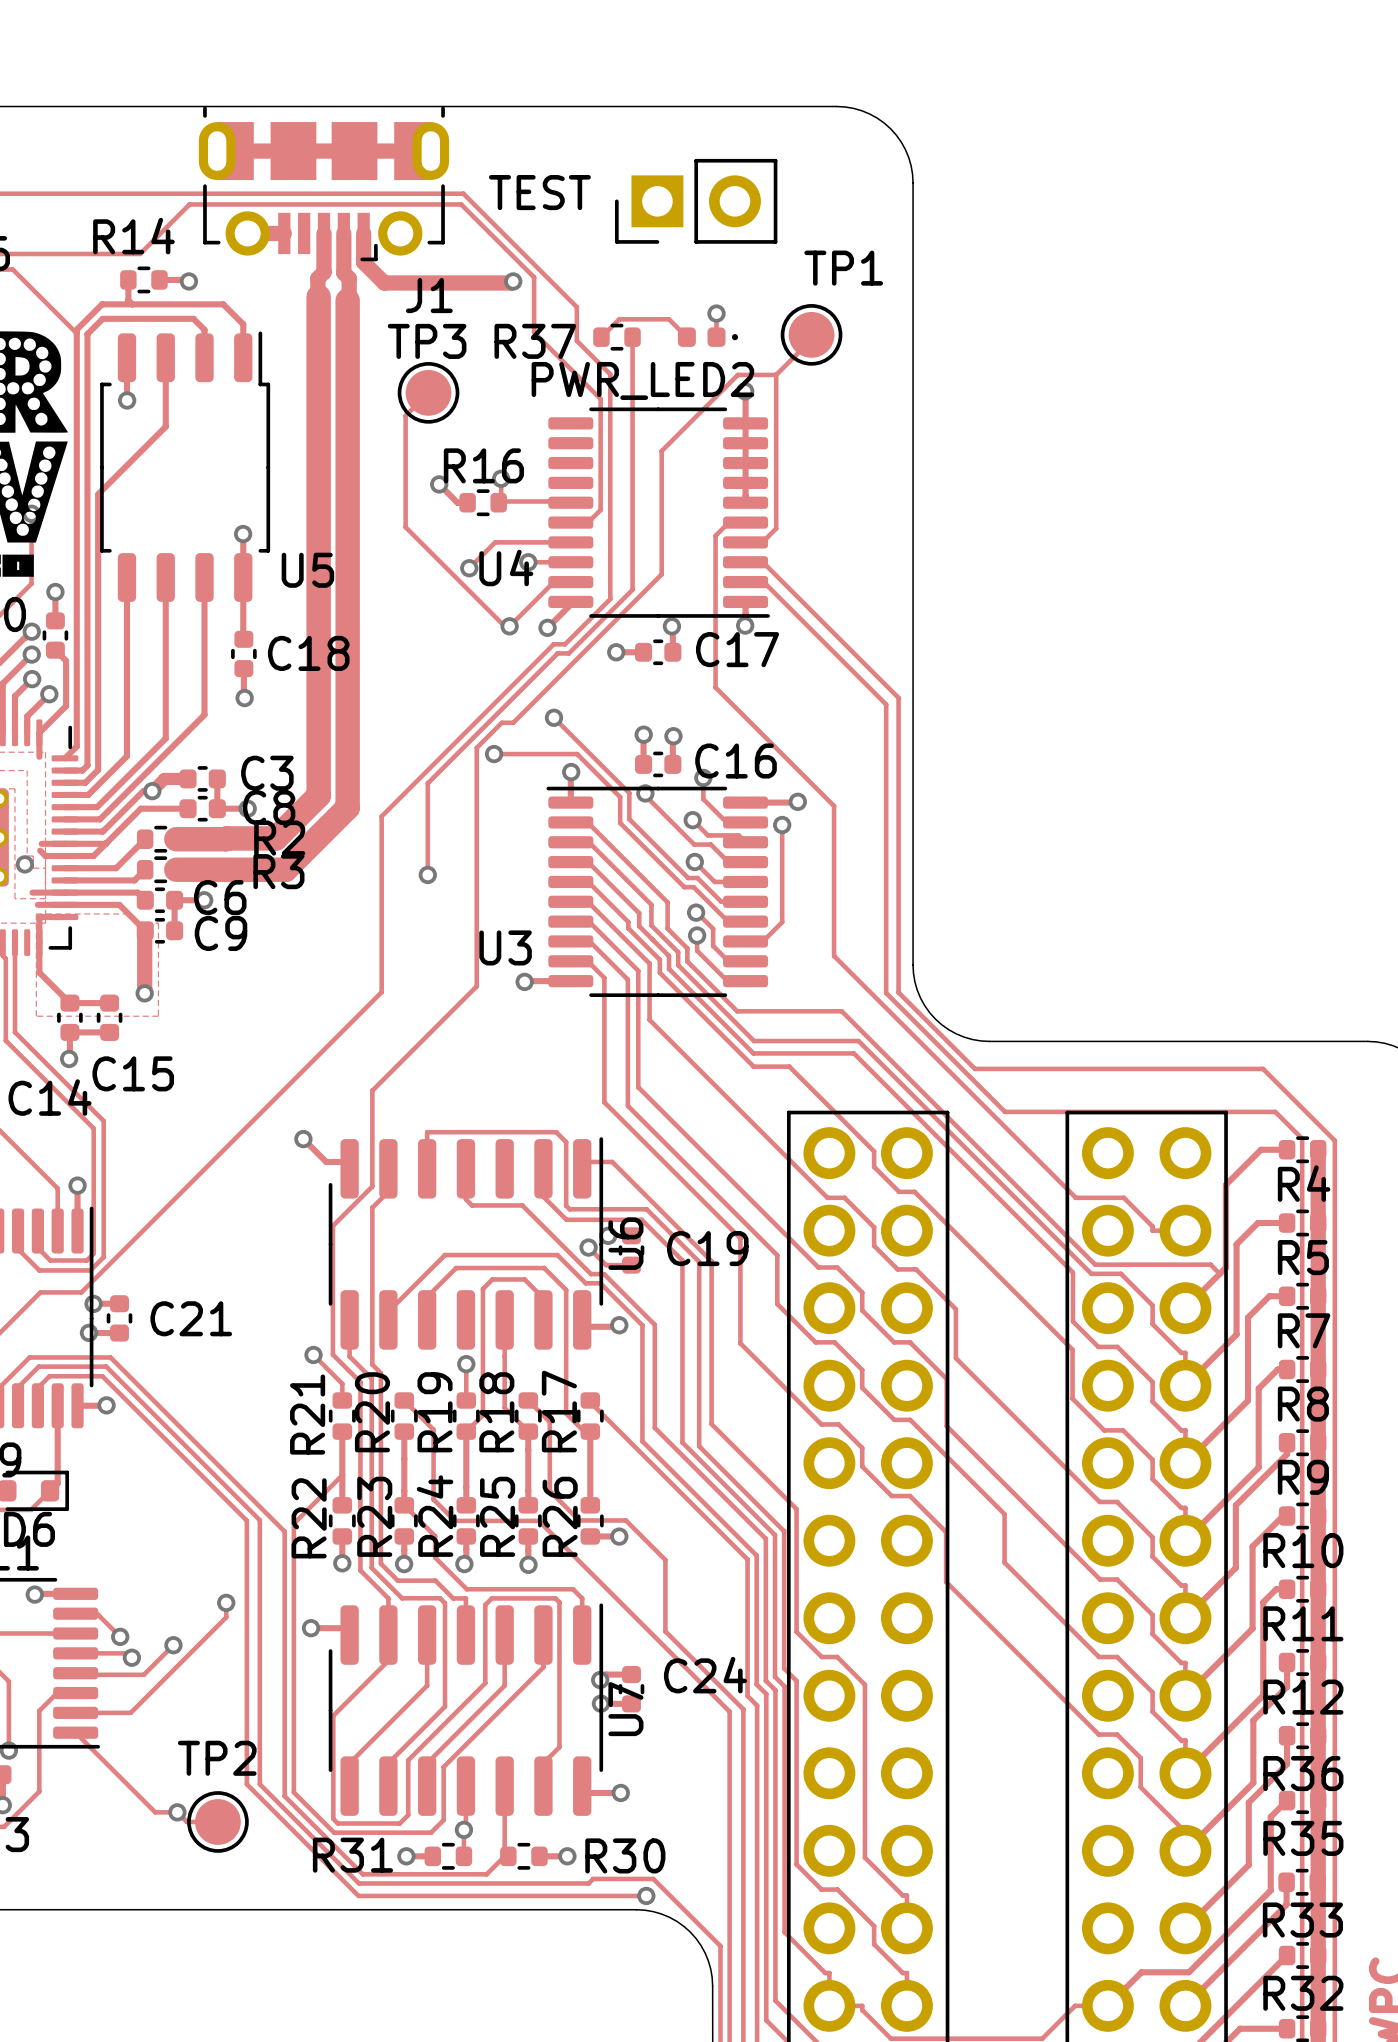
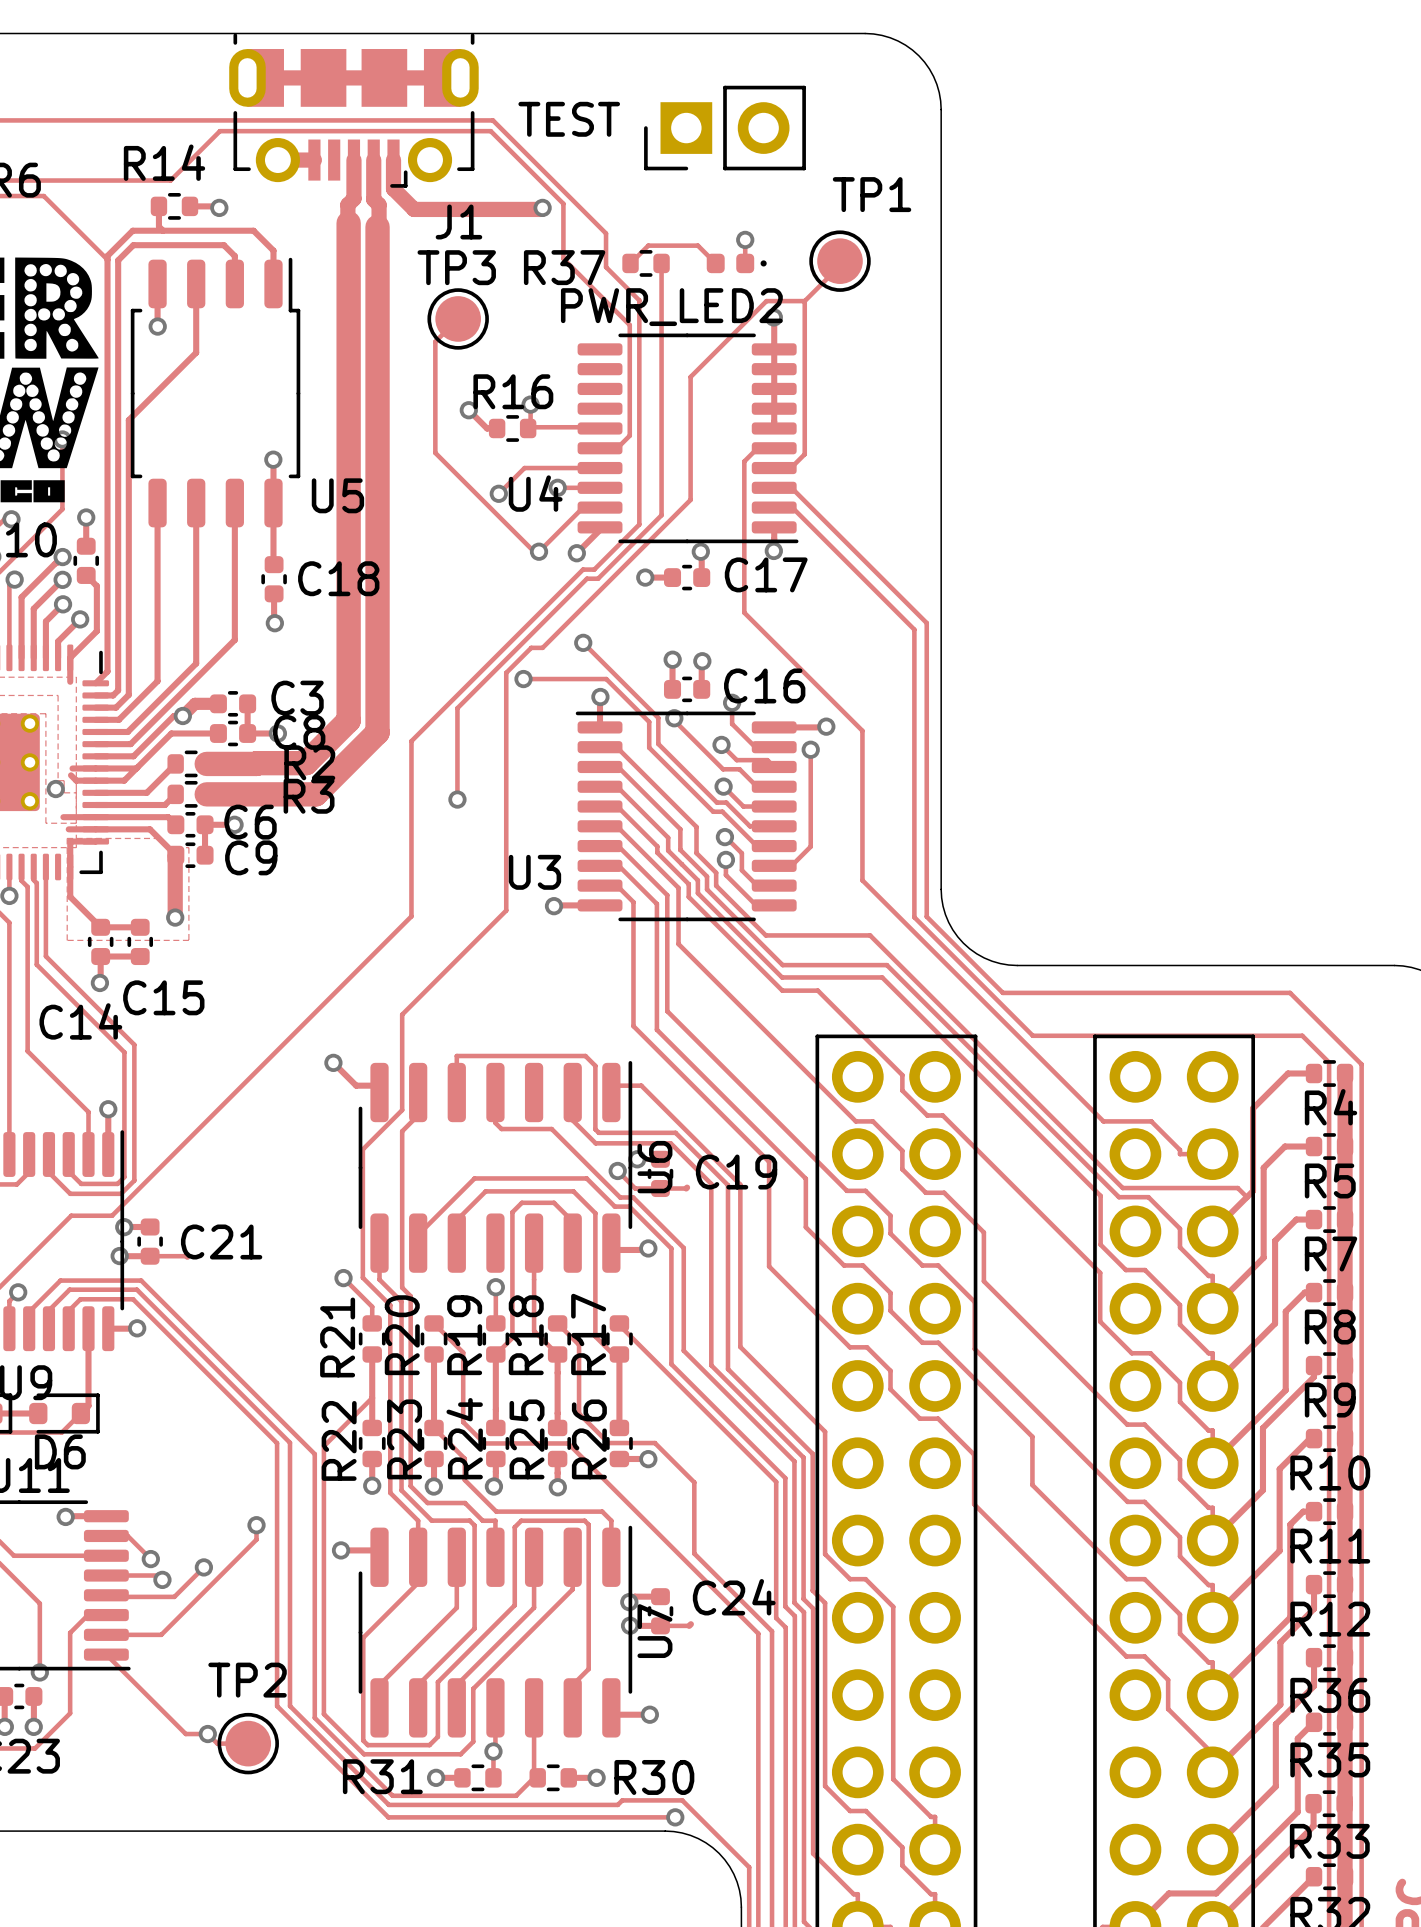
track: none -> (687, 1187) (660, 1188)
track: none -> (150, 1256) (187, 1256)
track: none -> (690, 1624) (689, 1625) (660, 1625)

